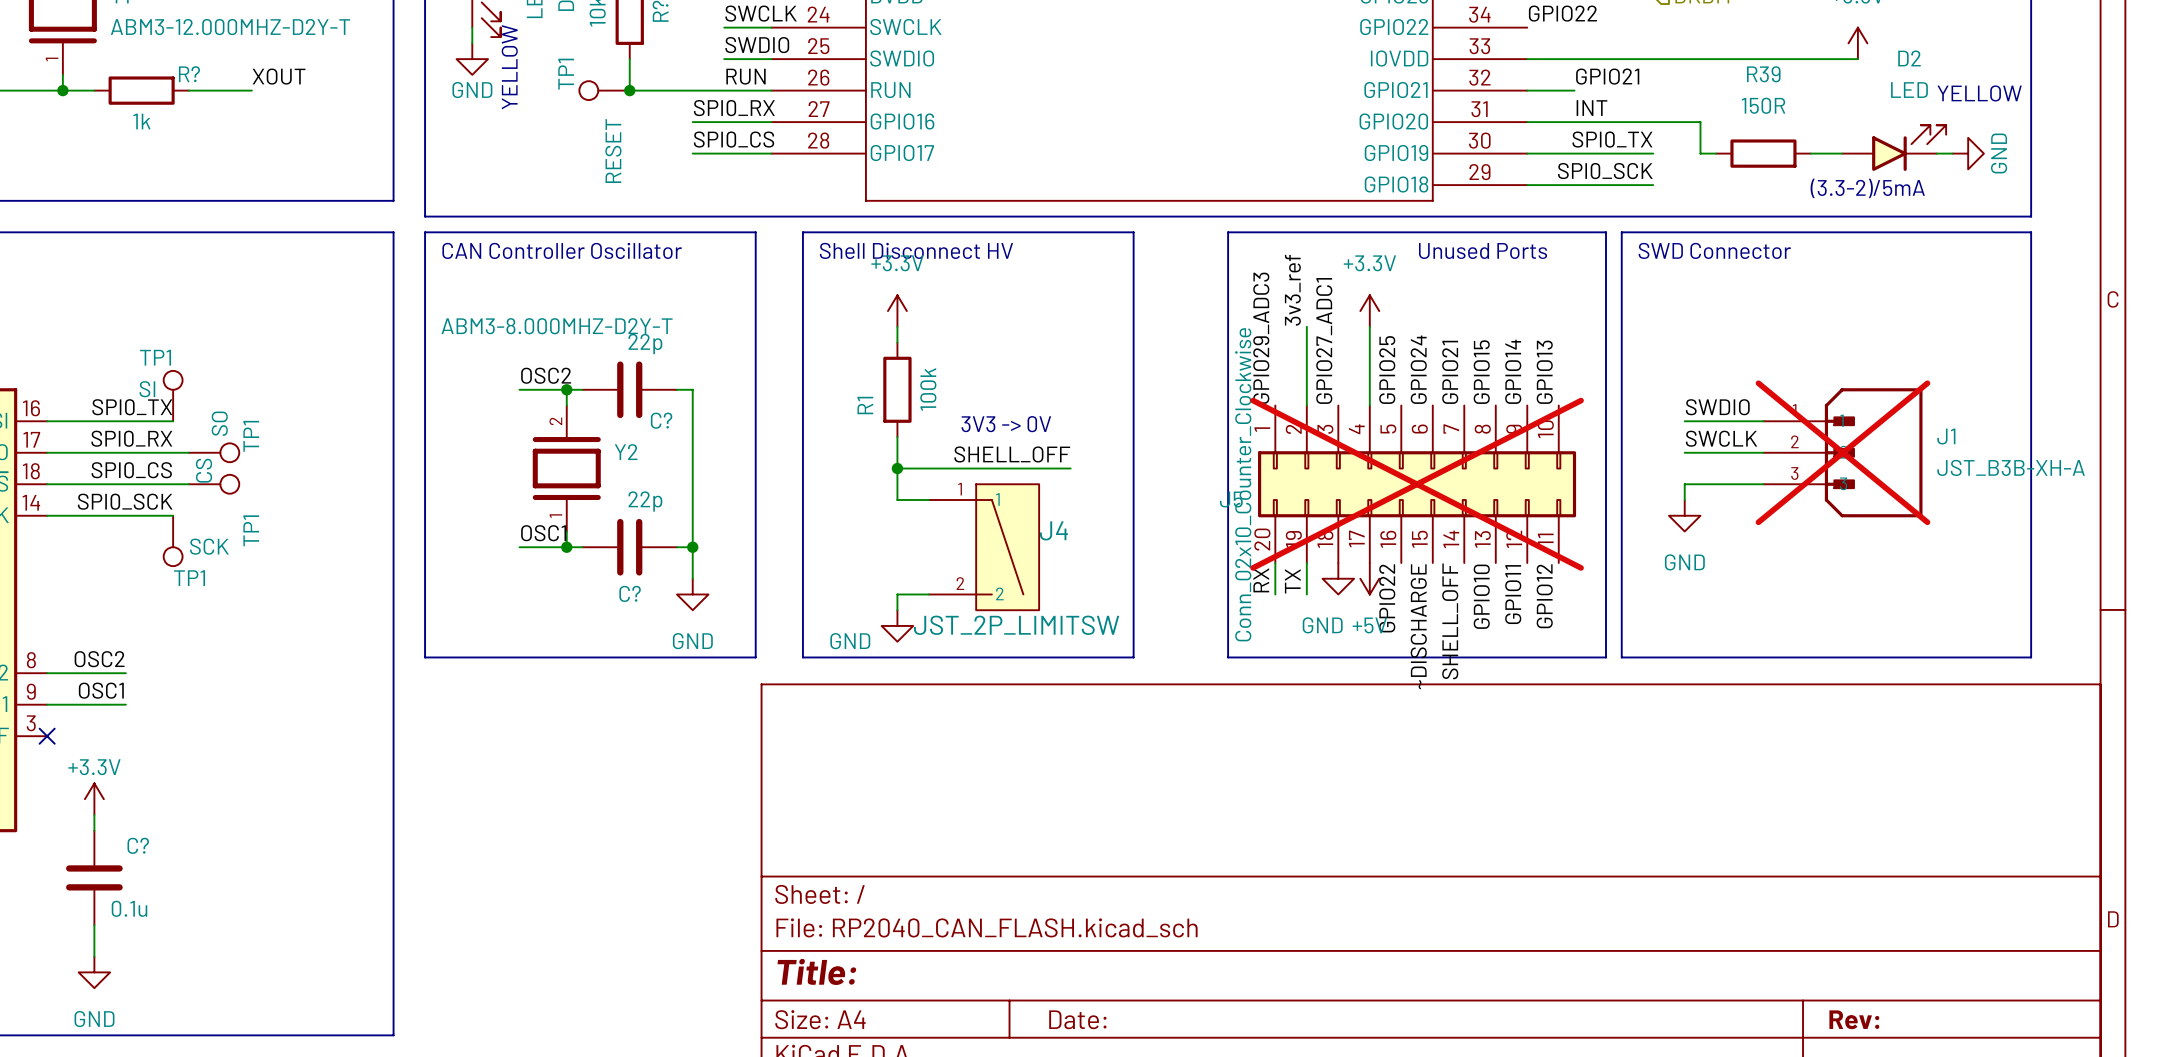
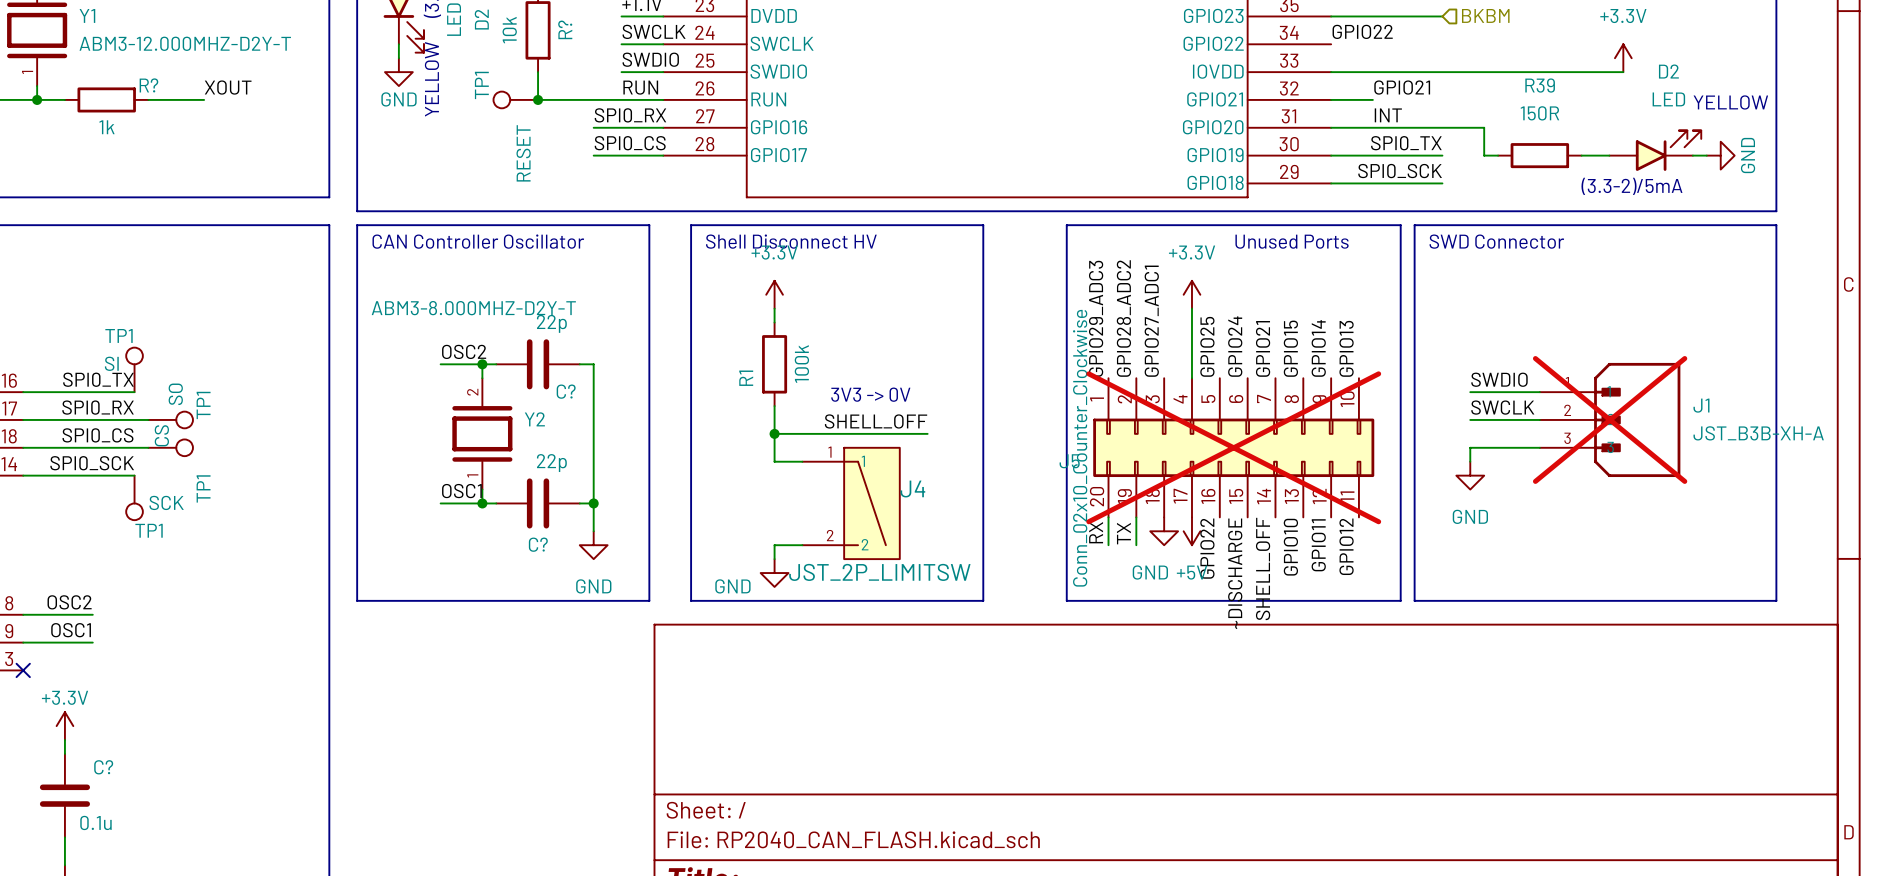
label: 3v3_ref (1292, 290) -> none
wire: (1306, 326) (1306, 405) -> none
label: none -> GPIO28_ADC2 (1123, 318)

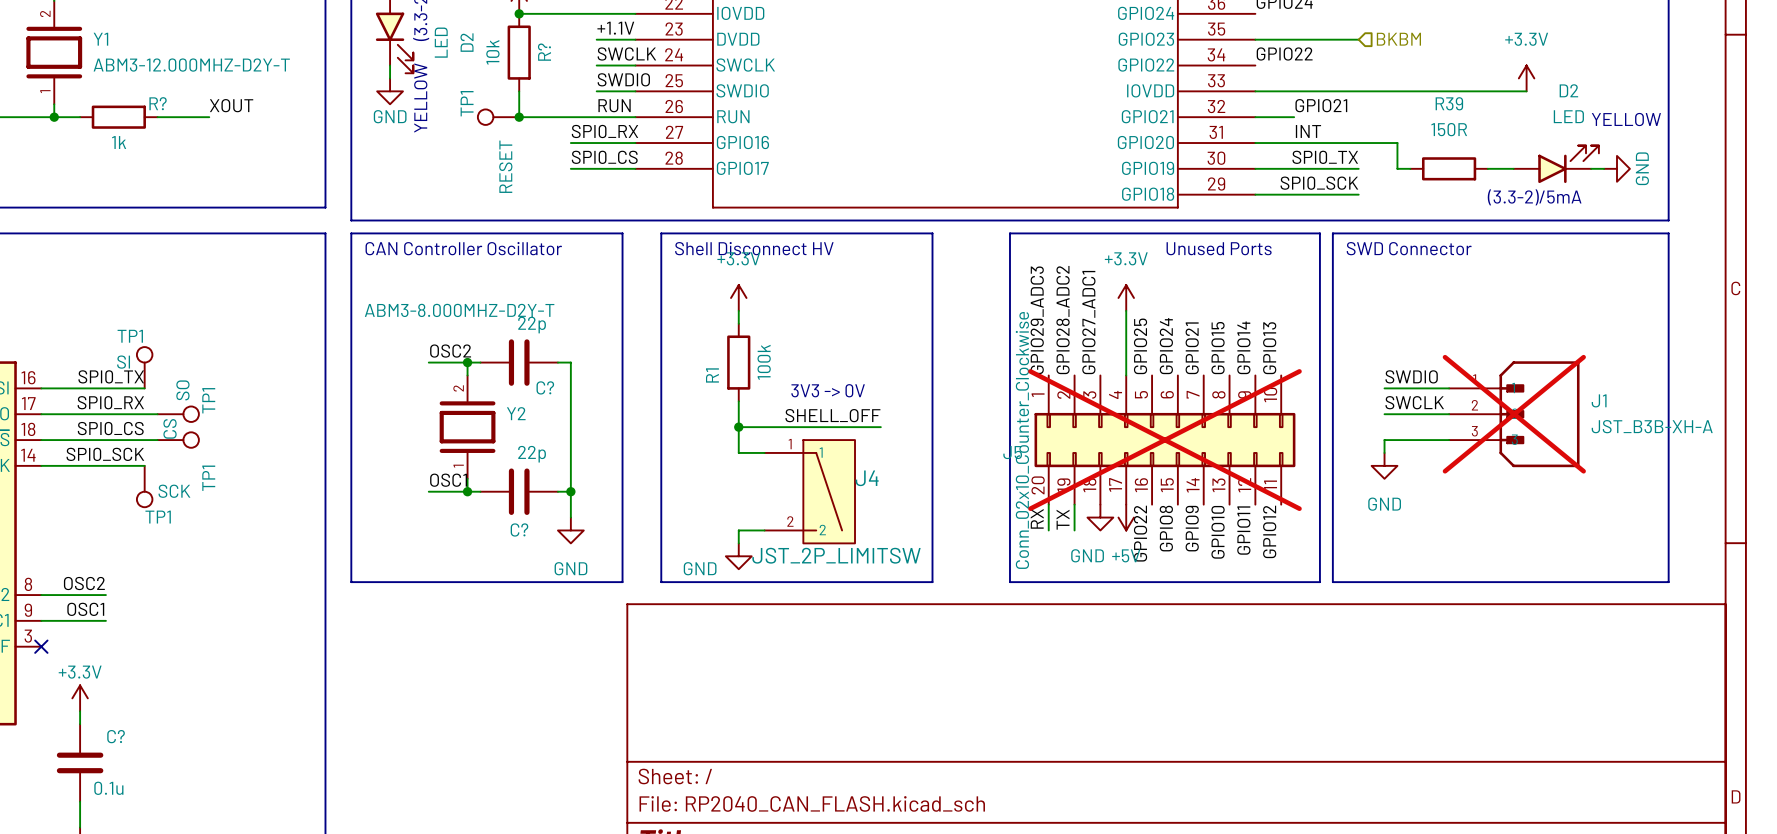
label: SHELL_OFF (1263, 568) -> GPIO9 (1192, 528)
label: ~DISCHARGE (1235, 573) -> GPIO8 (1166, 528)

